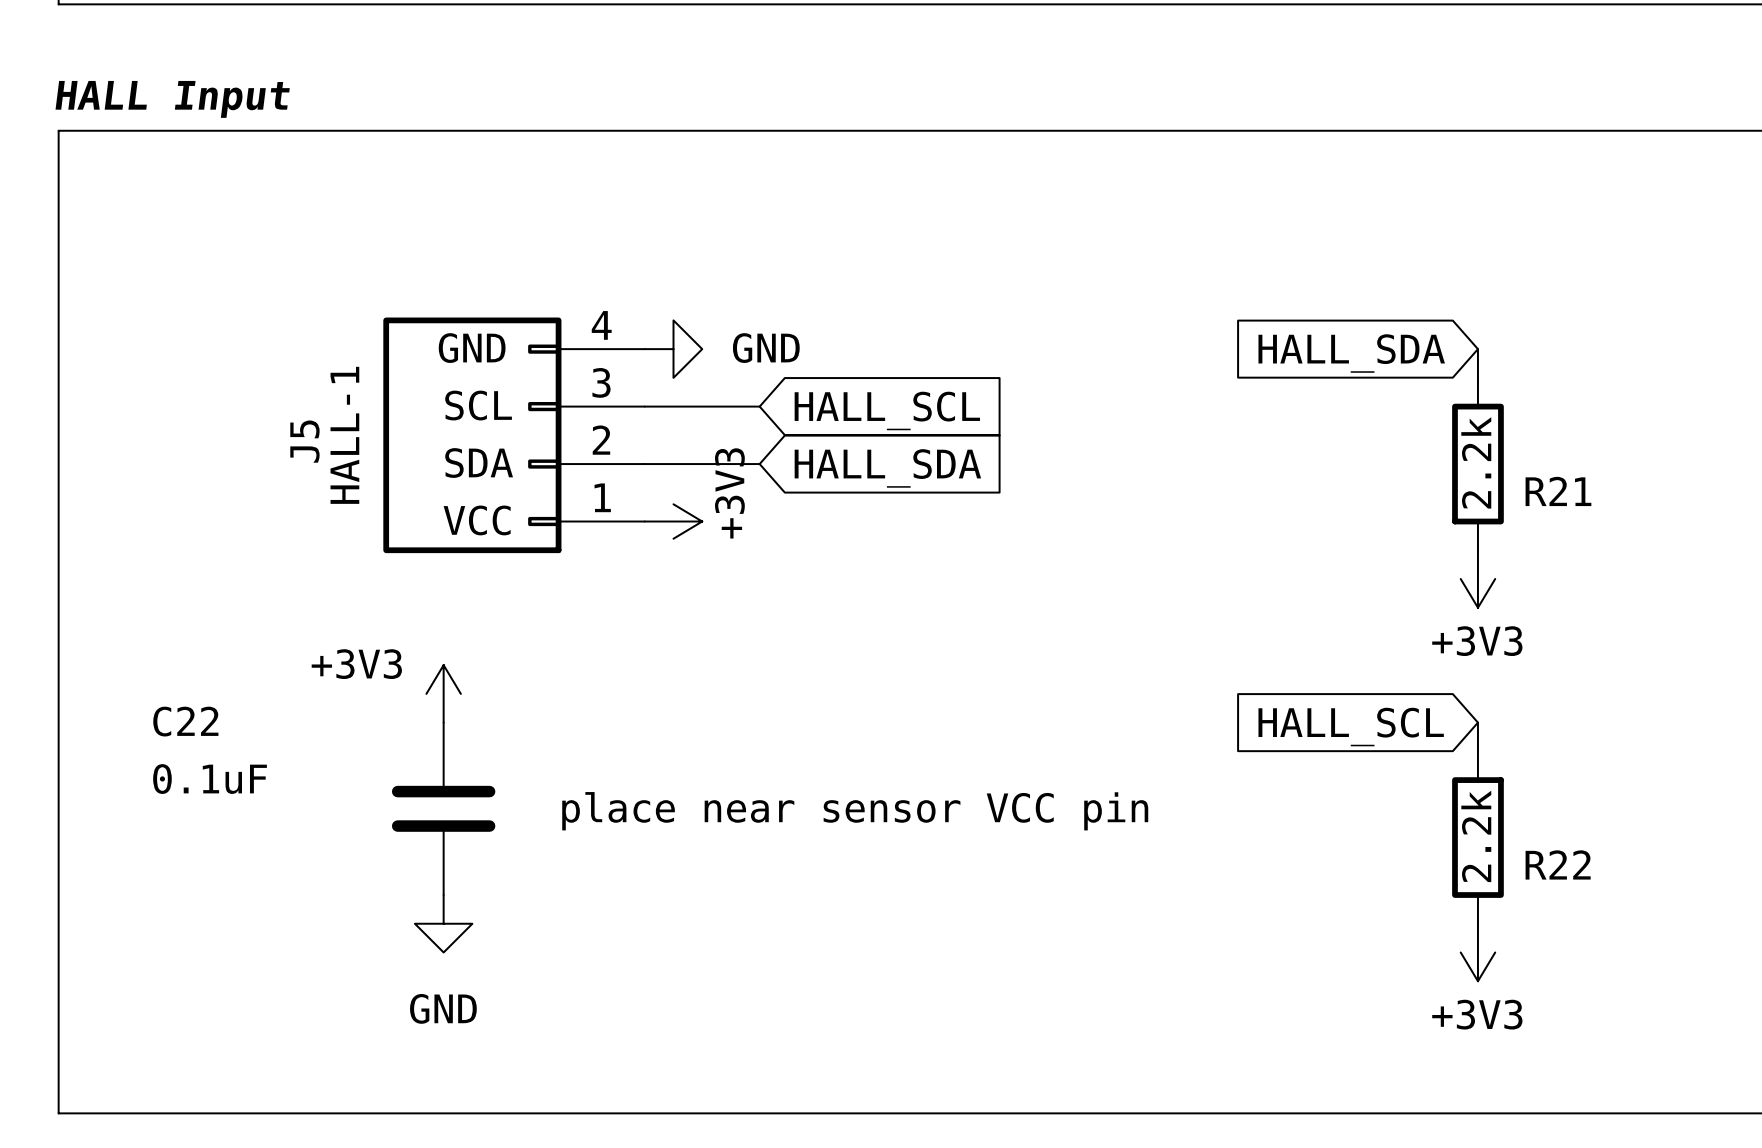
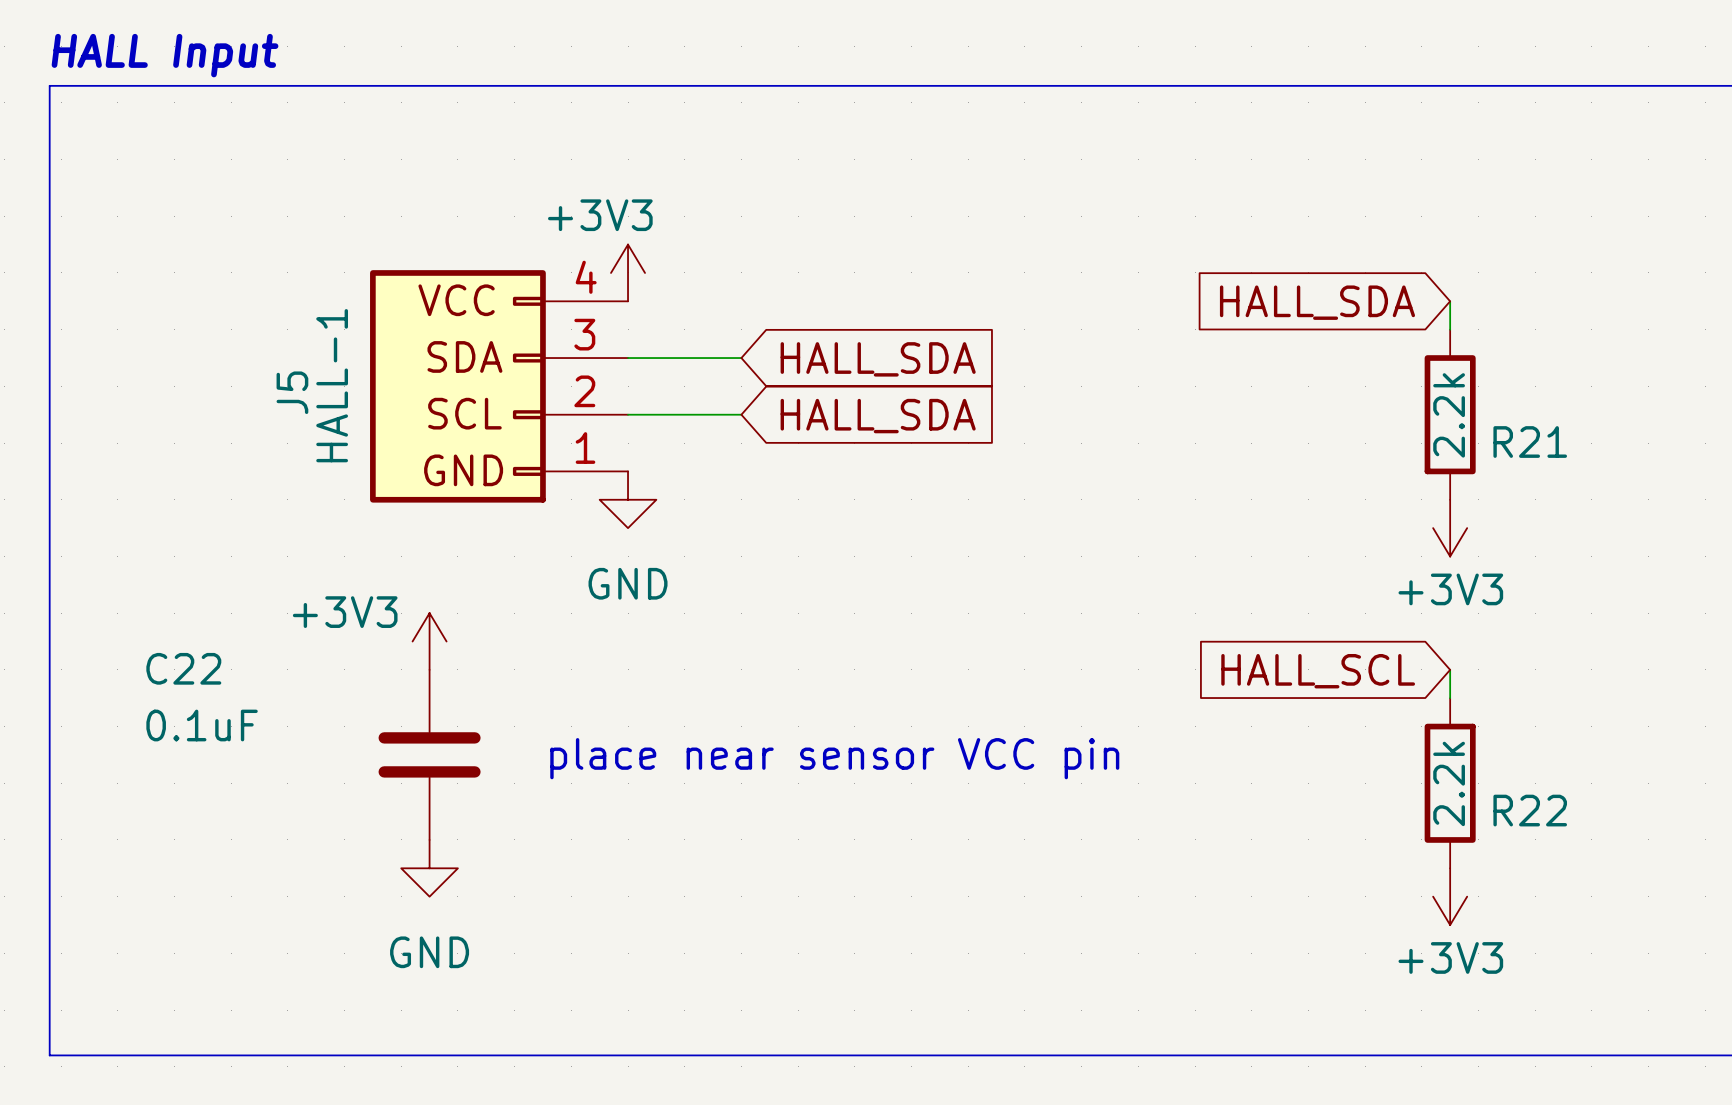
J5 text: GND (472, 348) -> VCC (456, 300)
power symbol rotation: 0° (673, 349) -> 90° clockwise (628, 499)
power symbol position: GND (673, 349) -> GND (628, 499)
J5 text: SCL (478, 405) -> SDA (464, 356)
global label: HALL_SCL (887, 410) -> HALL_SDA (878, 359)
J5 text: SDA (479, 462) -> SCL (464, 413)
J5 text: VCC (477, 520) -> GND (463, 470)
power symbol rotation: 0° (673, 521) -> 90° counterclockwise (628, 272)
power symbol position: +3V3 (673, 521) -> +3V3 (628, 272)

